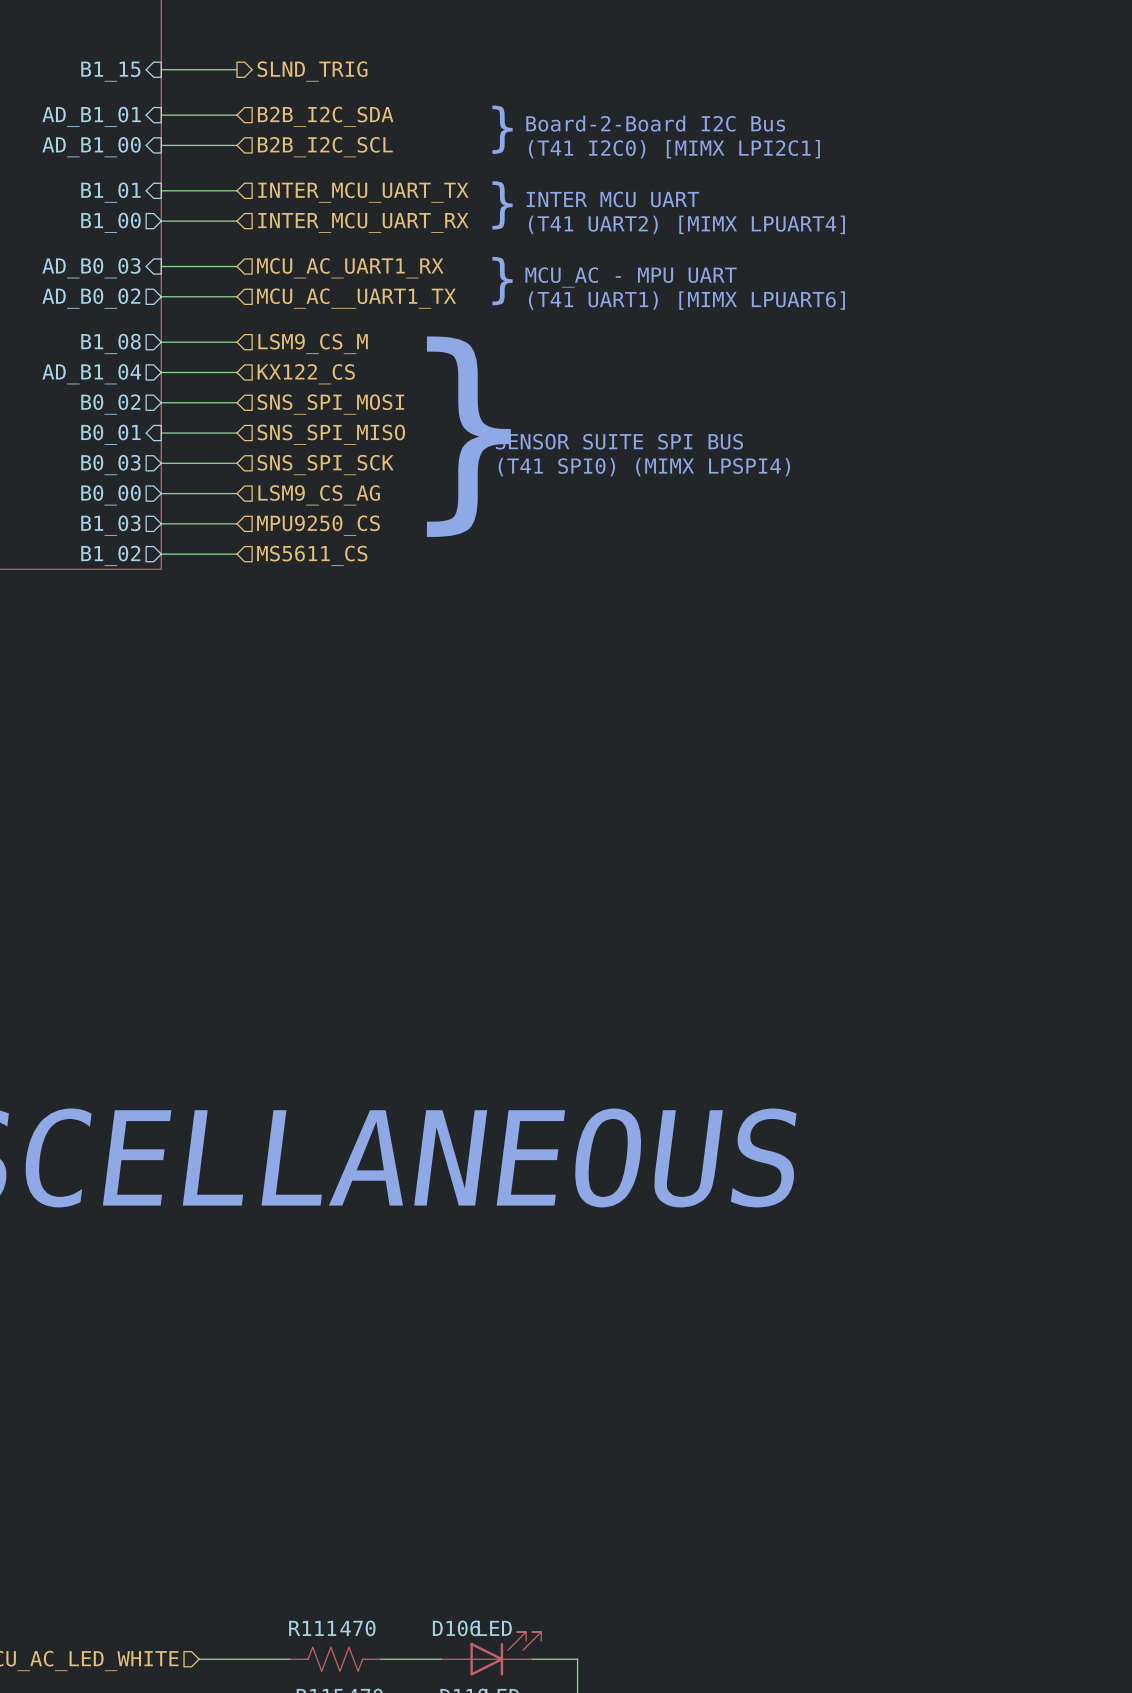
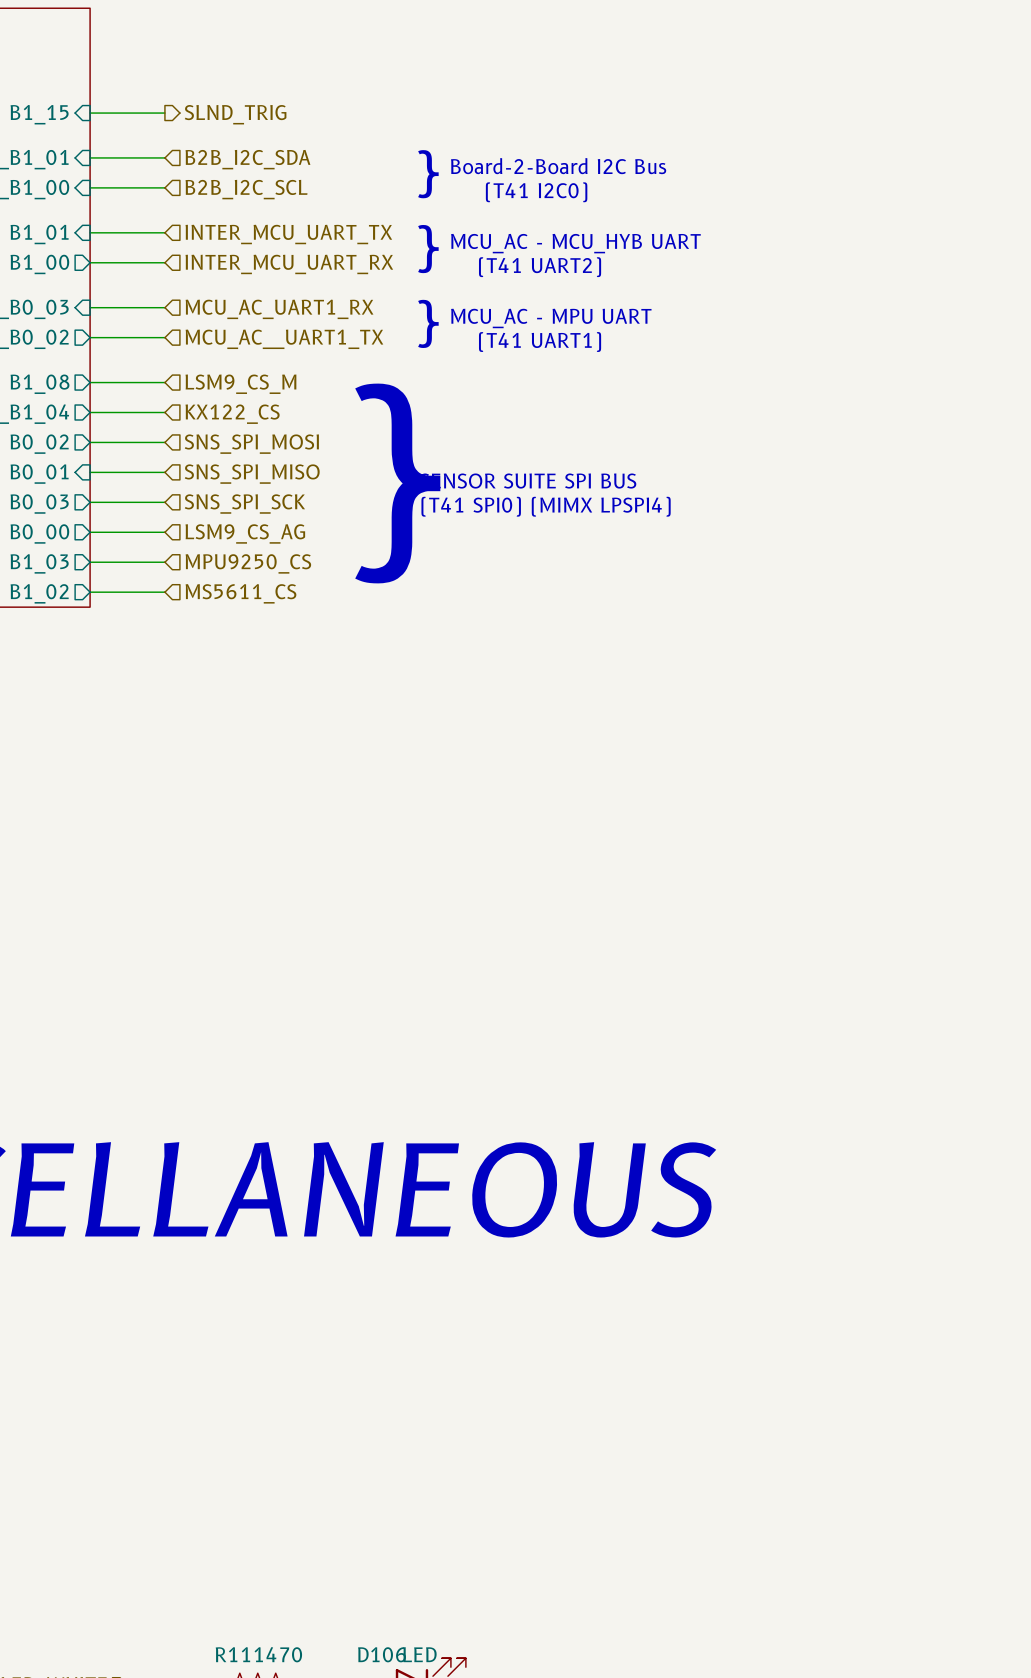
text: (T41 I2C0) [MIMX LPI2C1] (674, 149) -> (T41 I2C0) (536, 192)
text: INTER MCU UART (612, 199) -> MCU_AC - MCU_HYB UART (575, 243)
text: (T41 UART2) [MIMX LPUART4] (686, 224) -> (T41 UART2) (540, 267)
text: (T41 UART1) [MIMX LPUART6] (686, 300) -> (T41 UART1) (540, 342)

